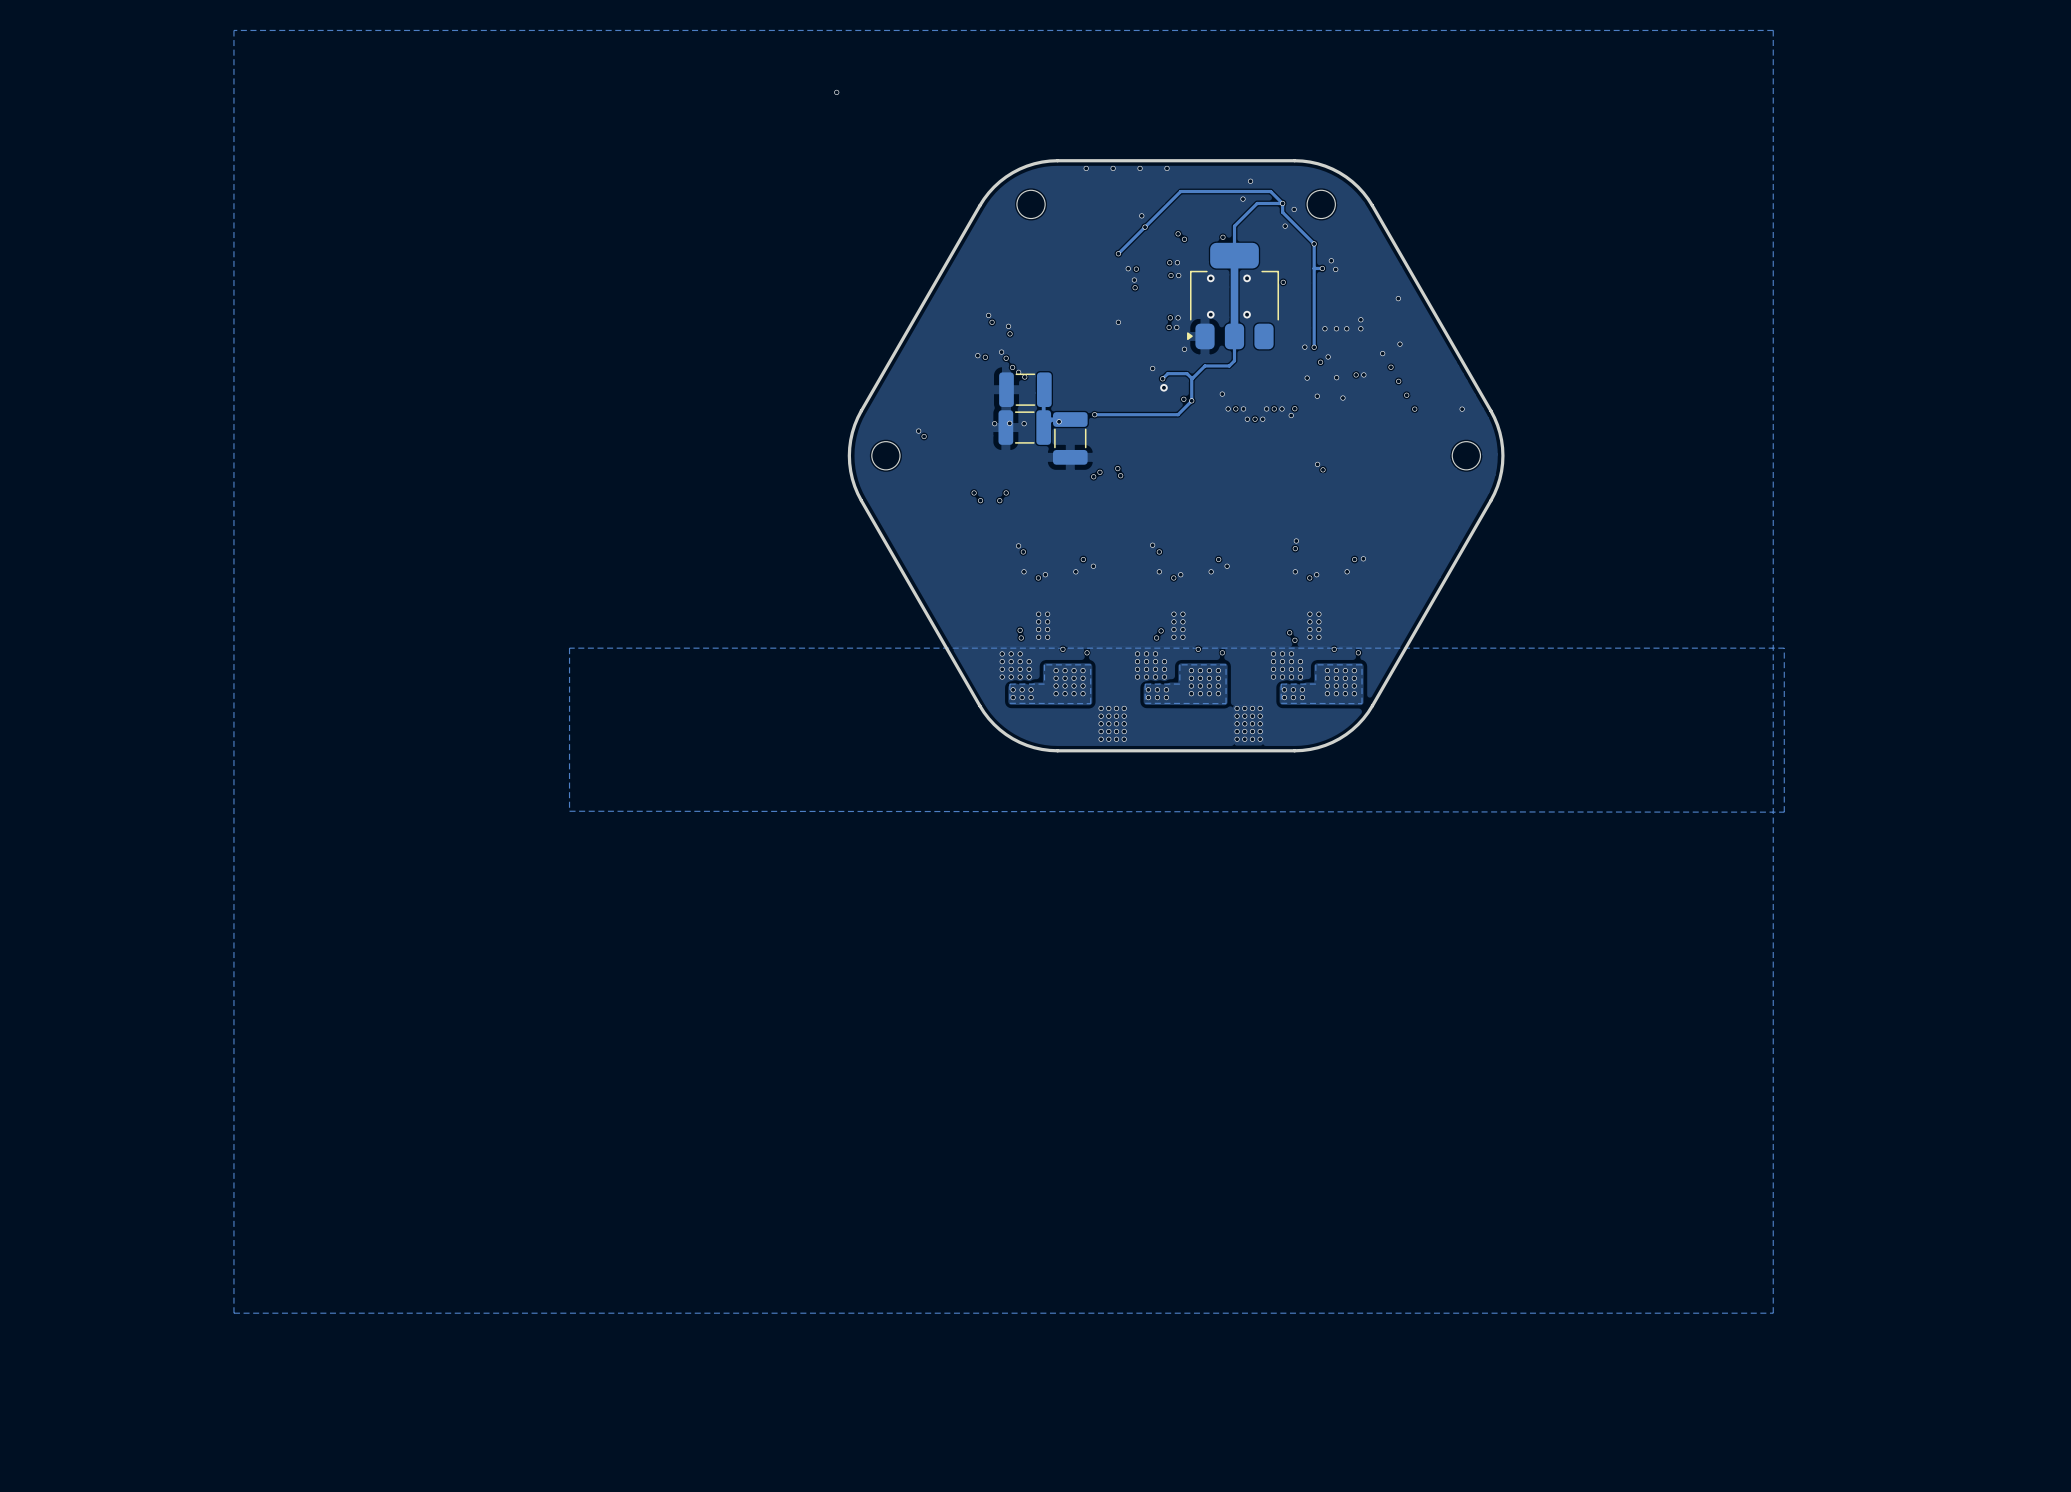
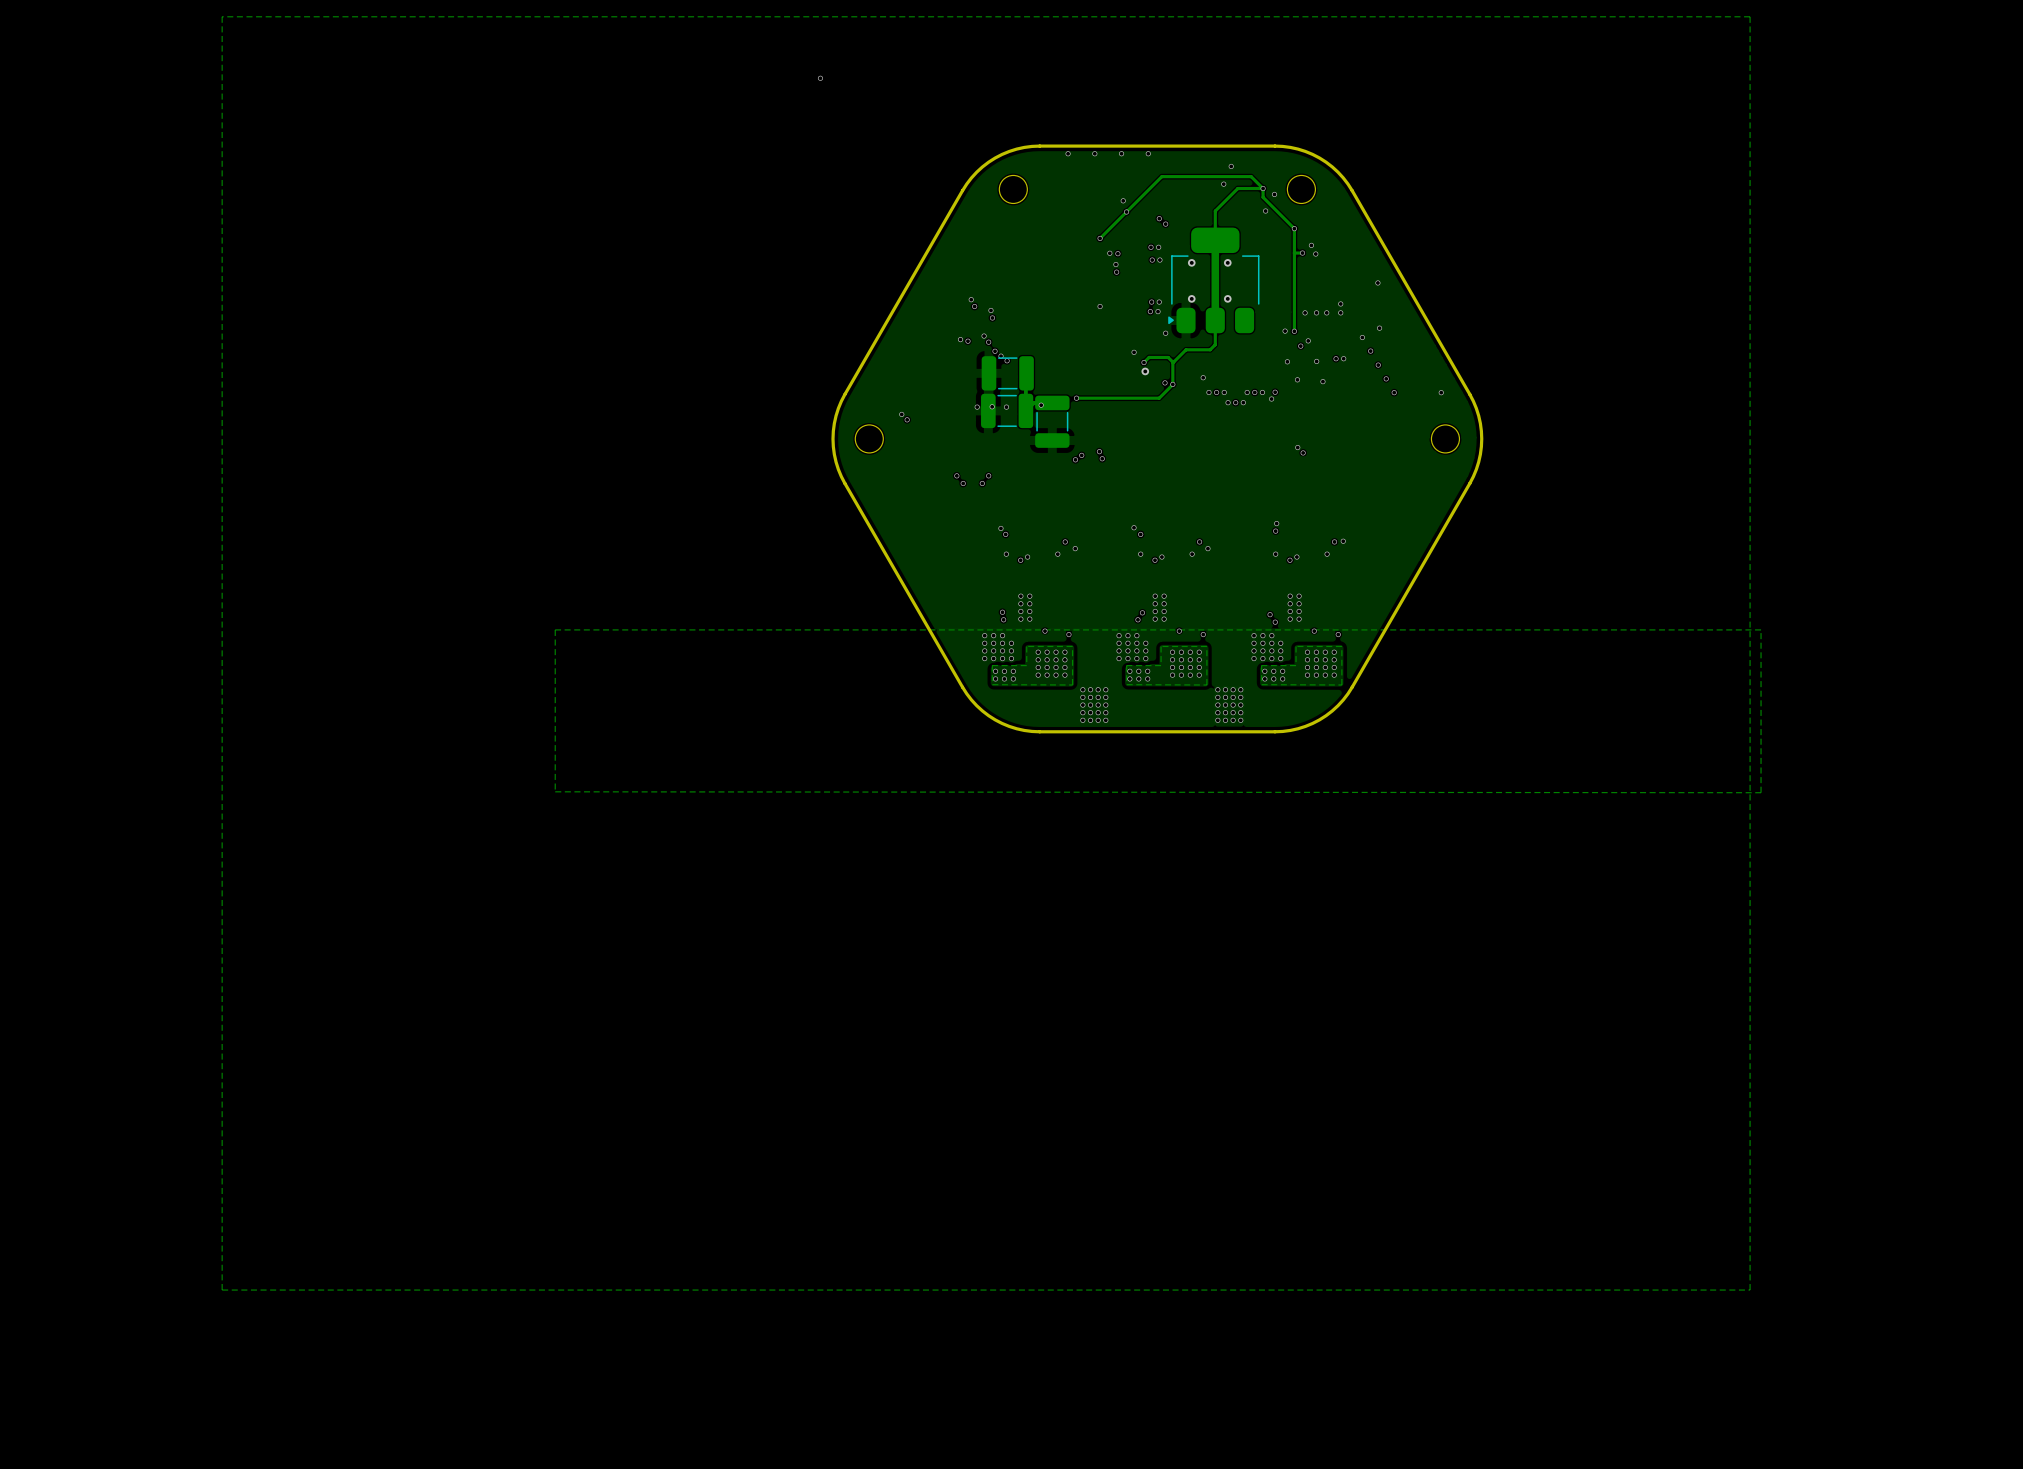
via: (1222, 237) -> none
via: (1283, 282) -> none

